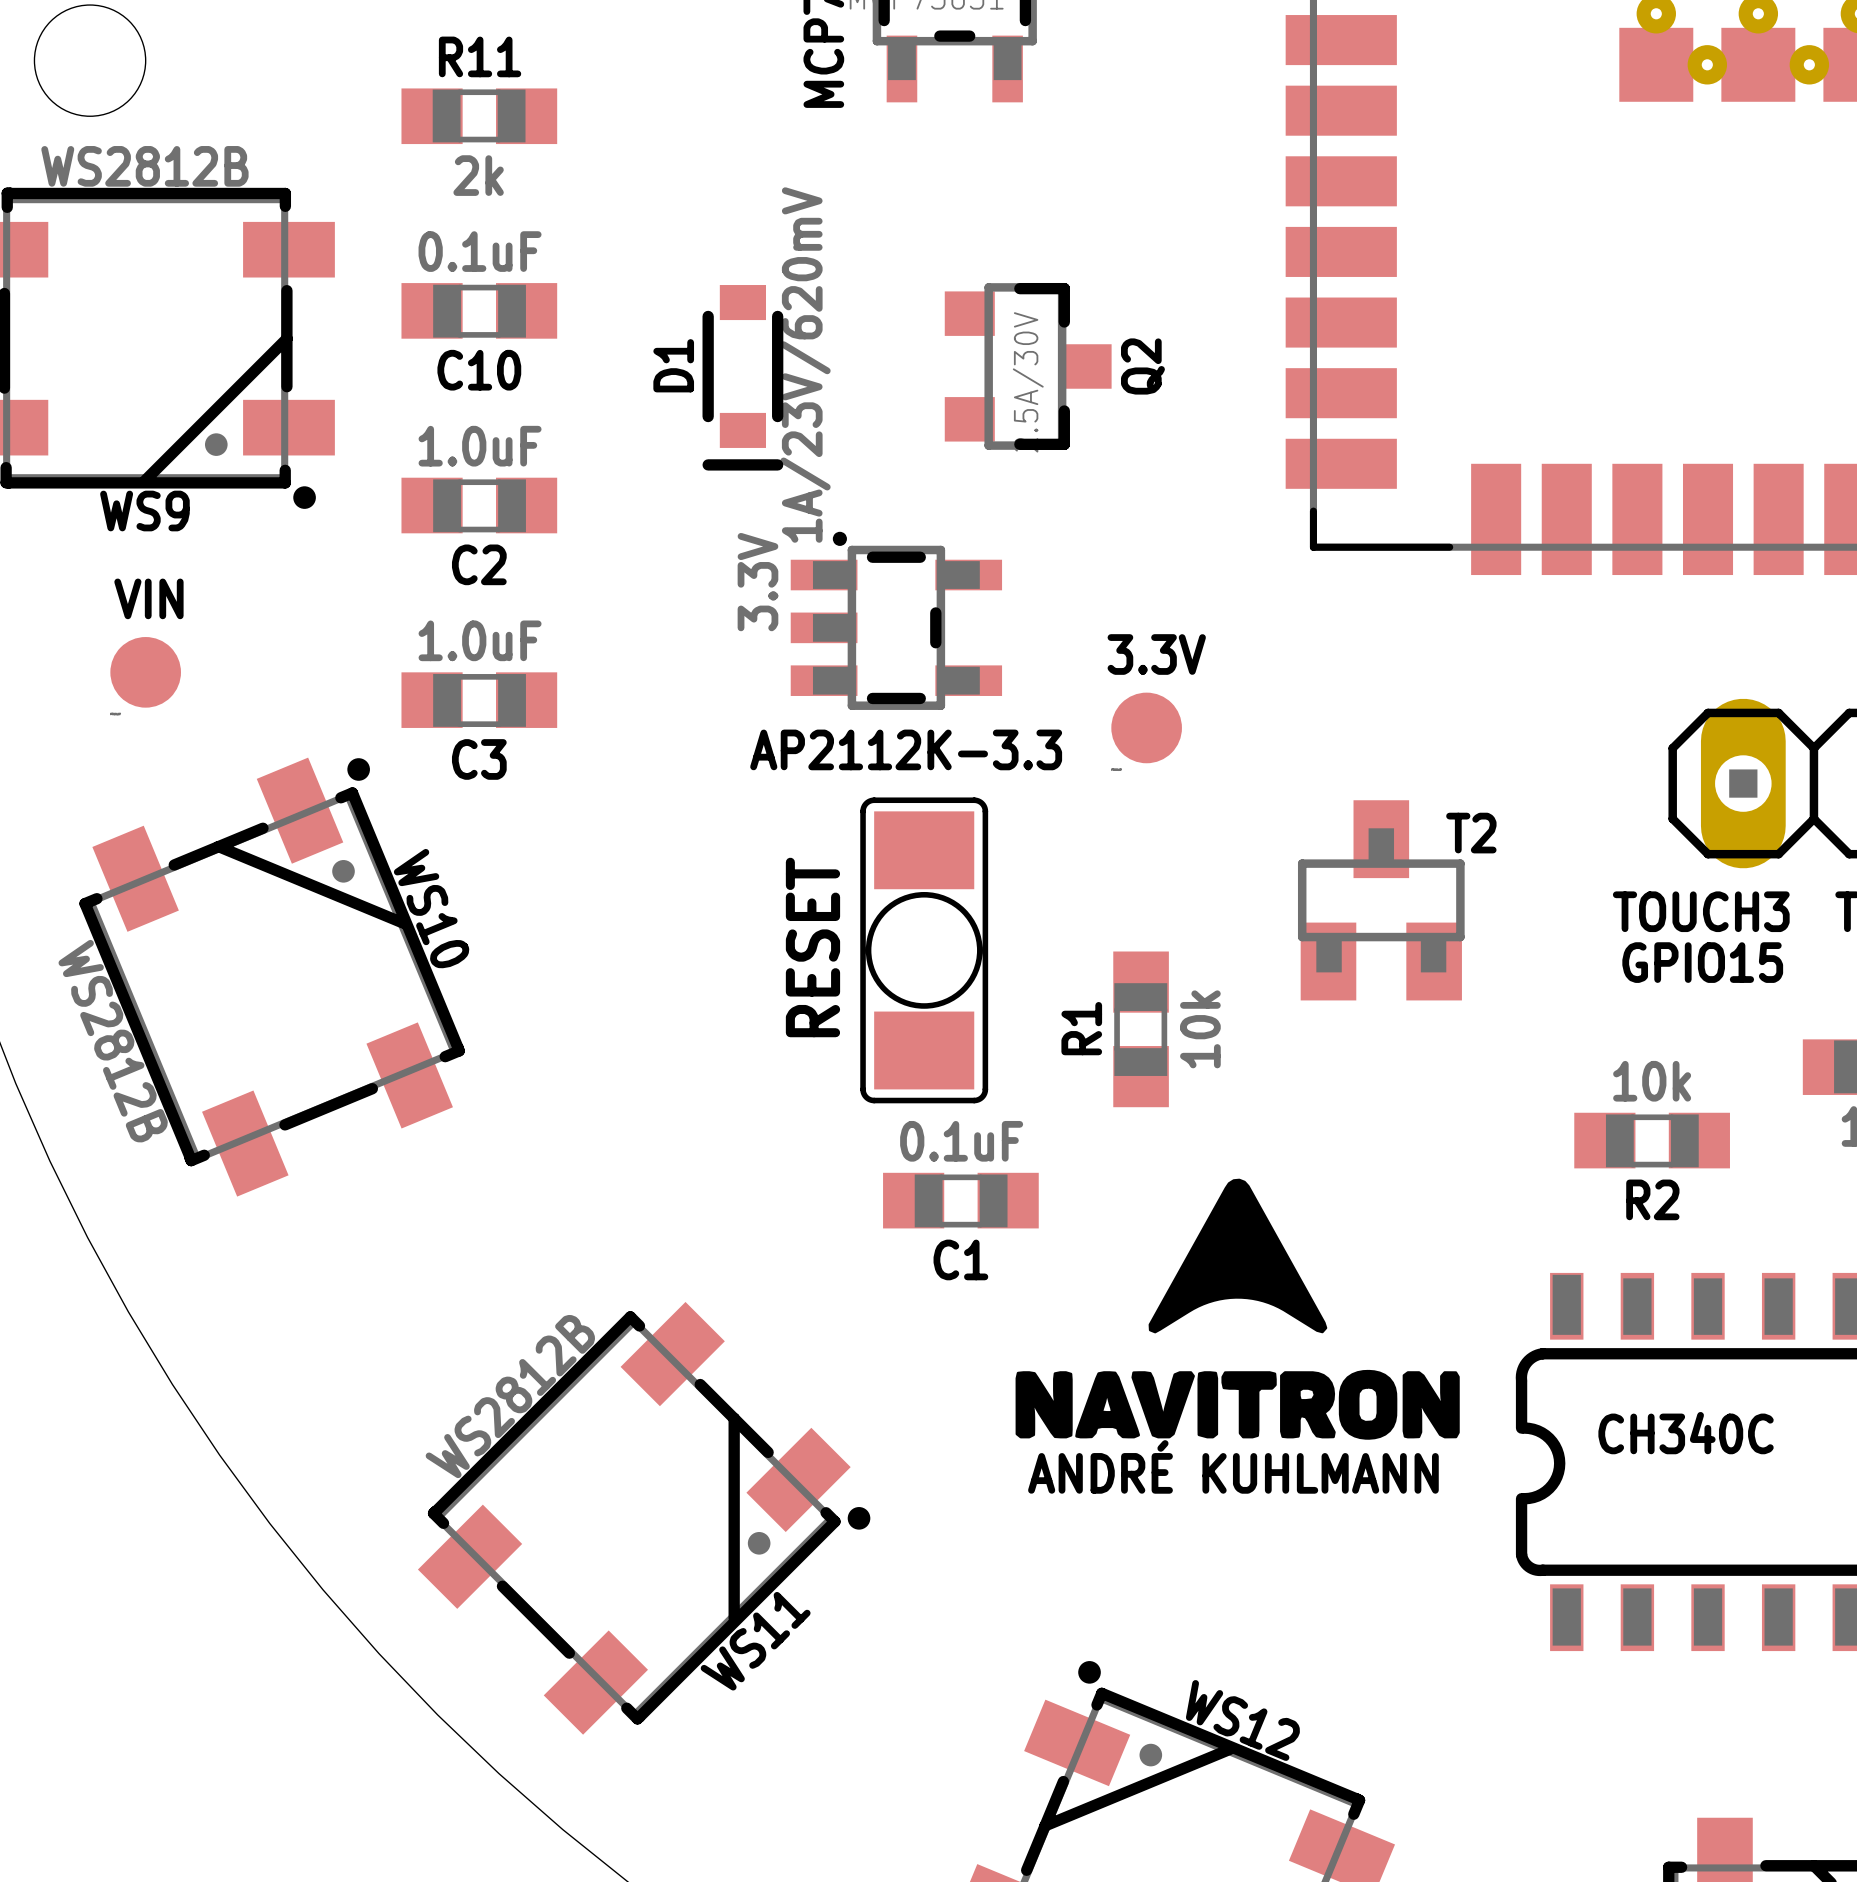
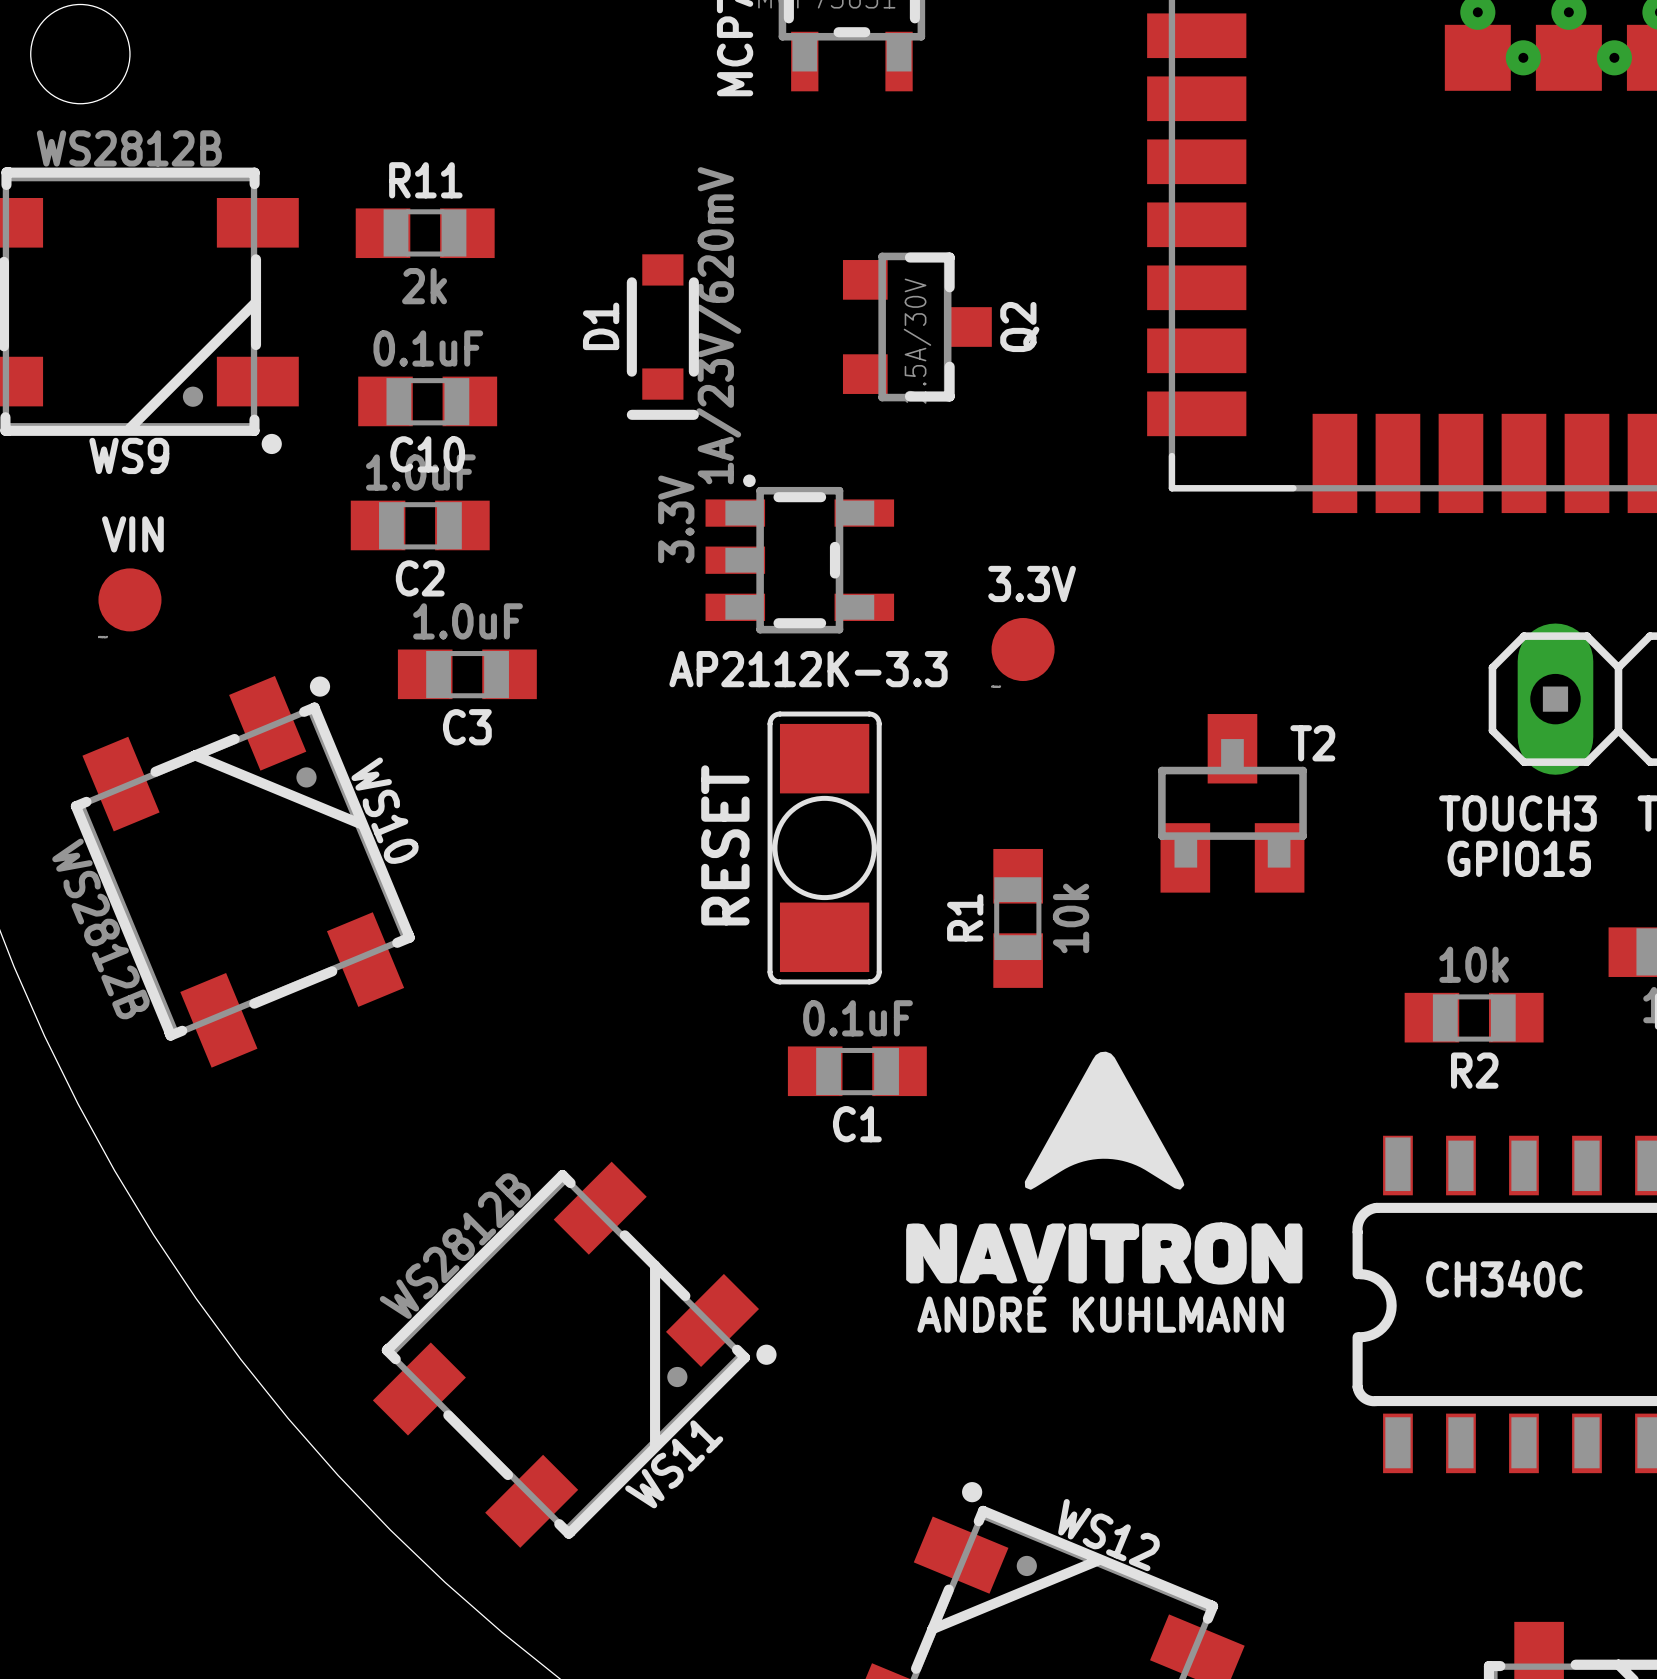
R11 position: (479, 116) -> (425, 233)
C10 position: (479, 310) -> (427, 401)
C2 position: (479, 505) -> (420, 525)
C3 position: (479, 700) -> (467, 674)

